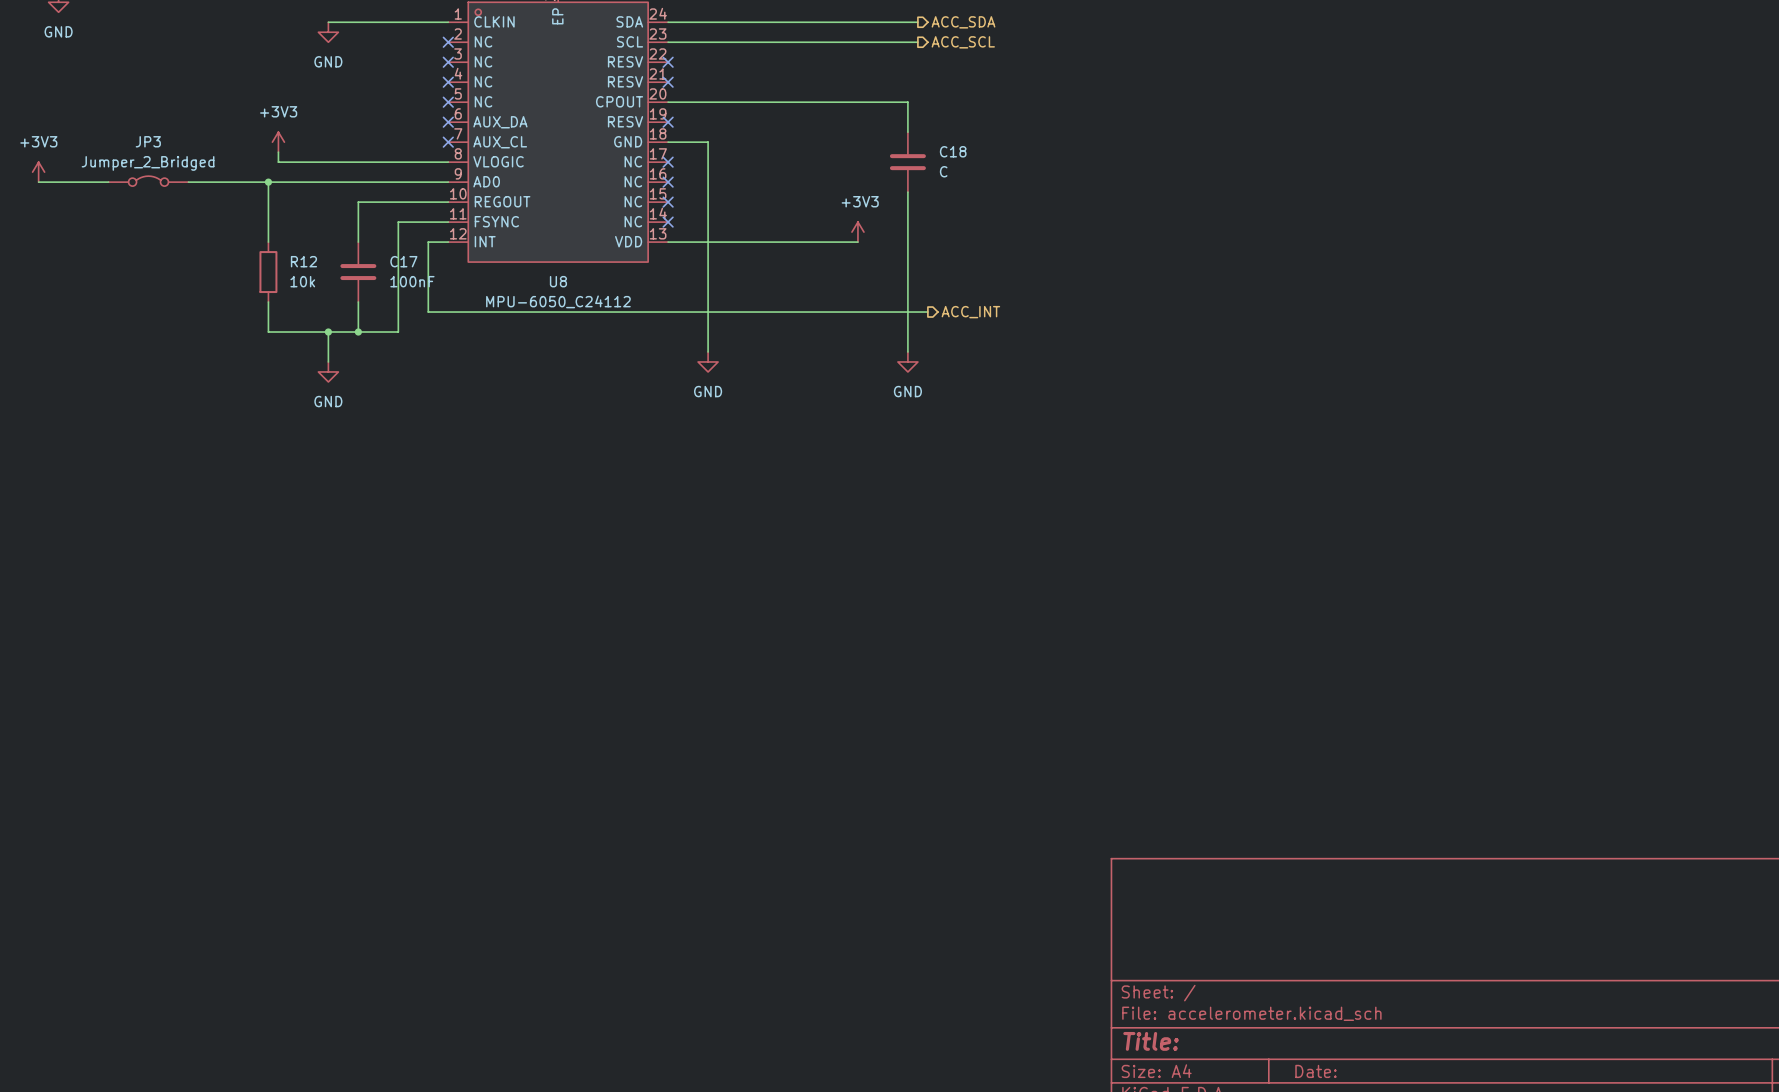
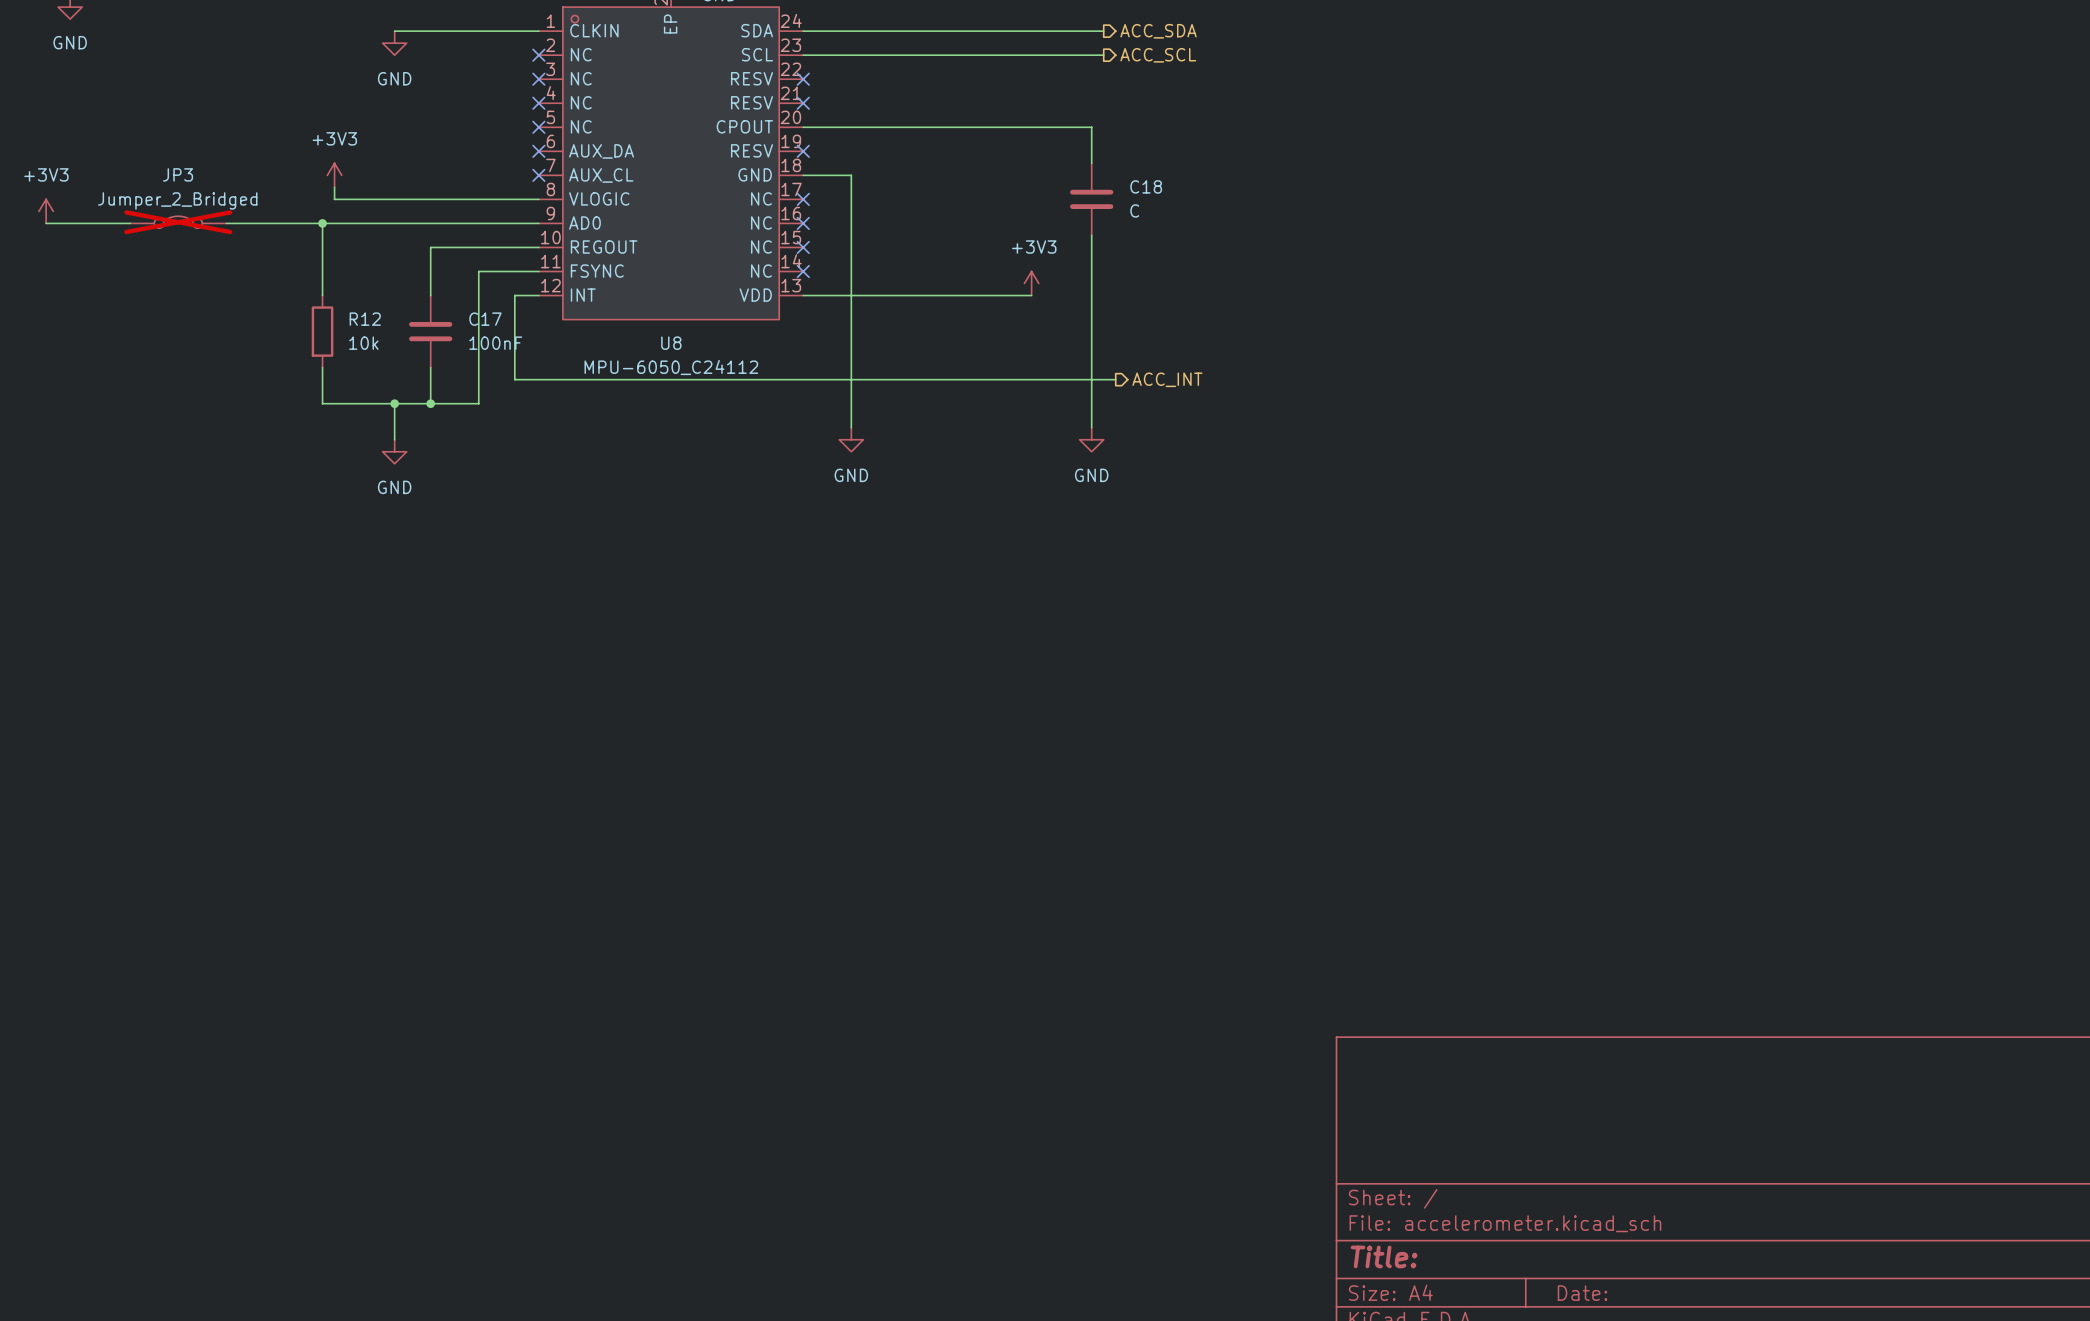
JP3 do-not-place cross: none -> (178, 222)

